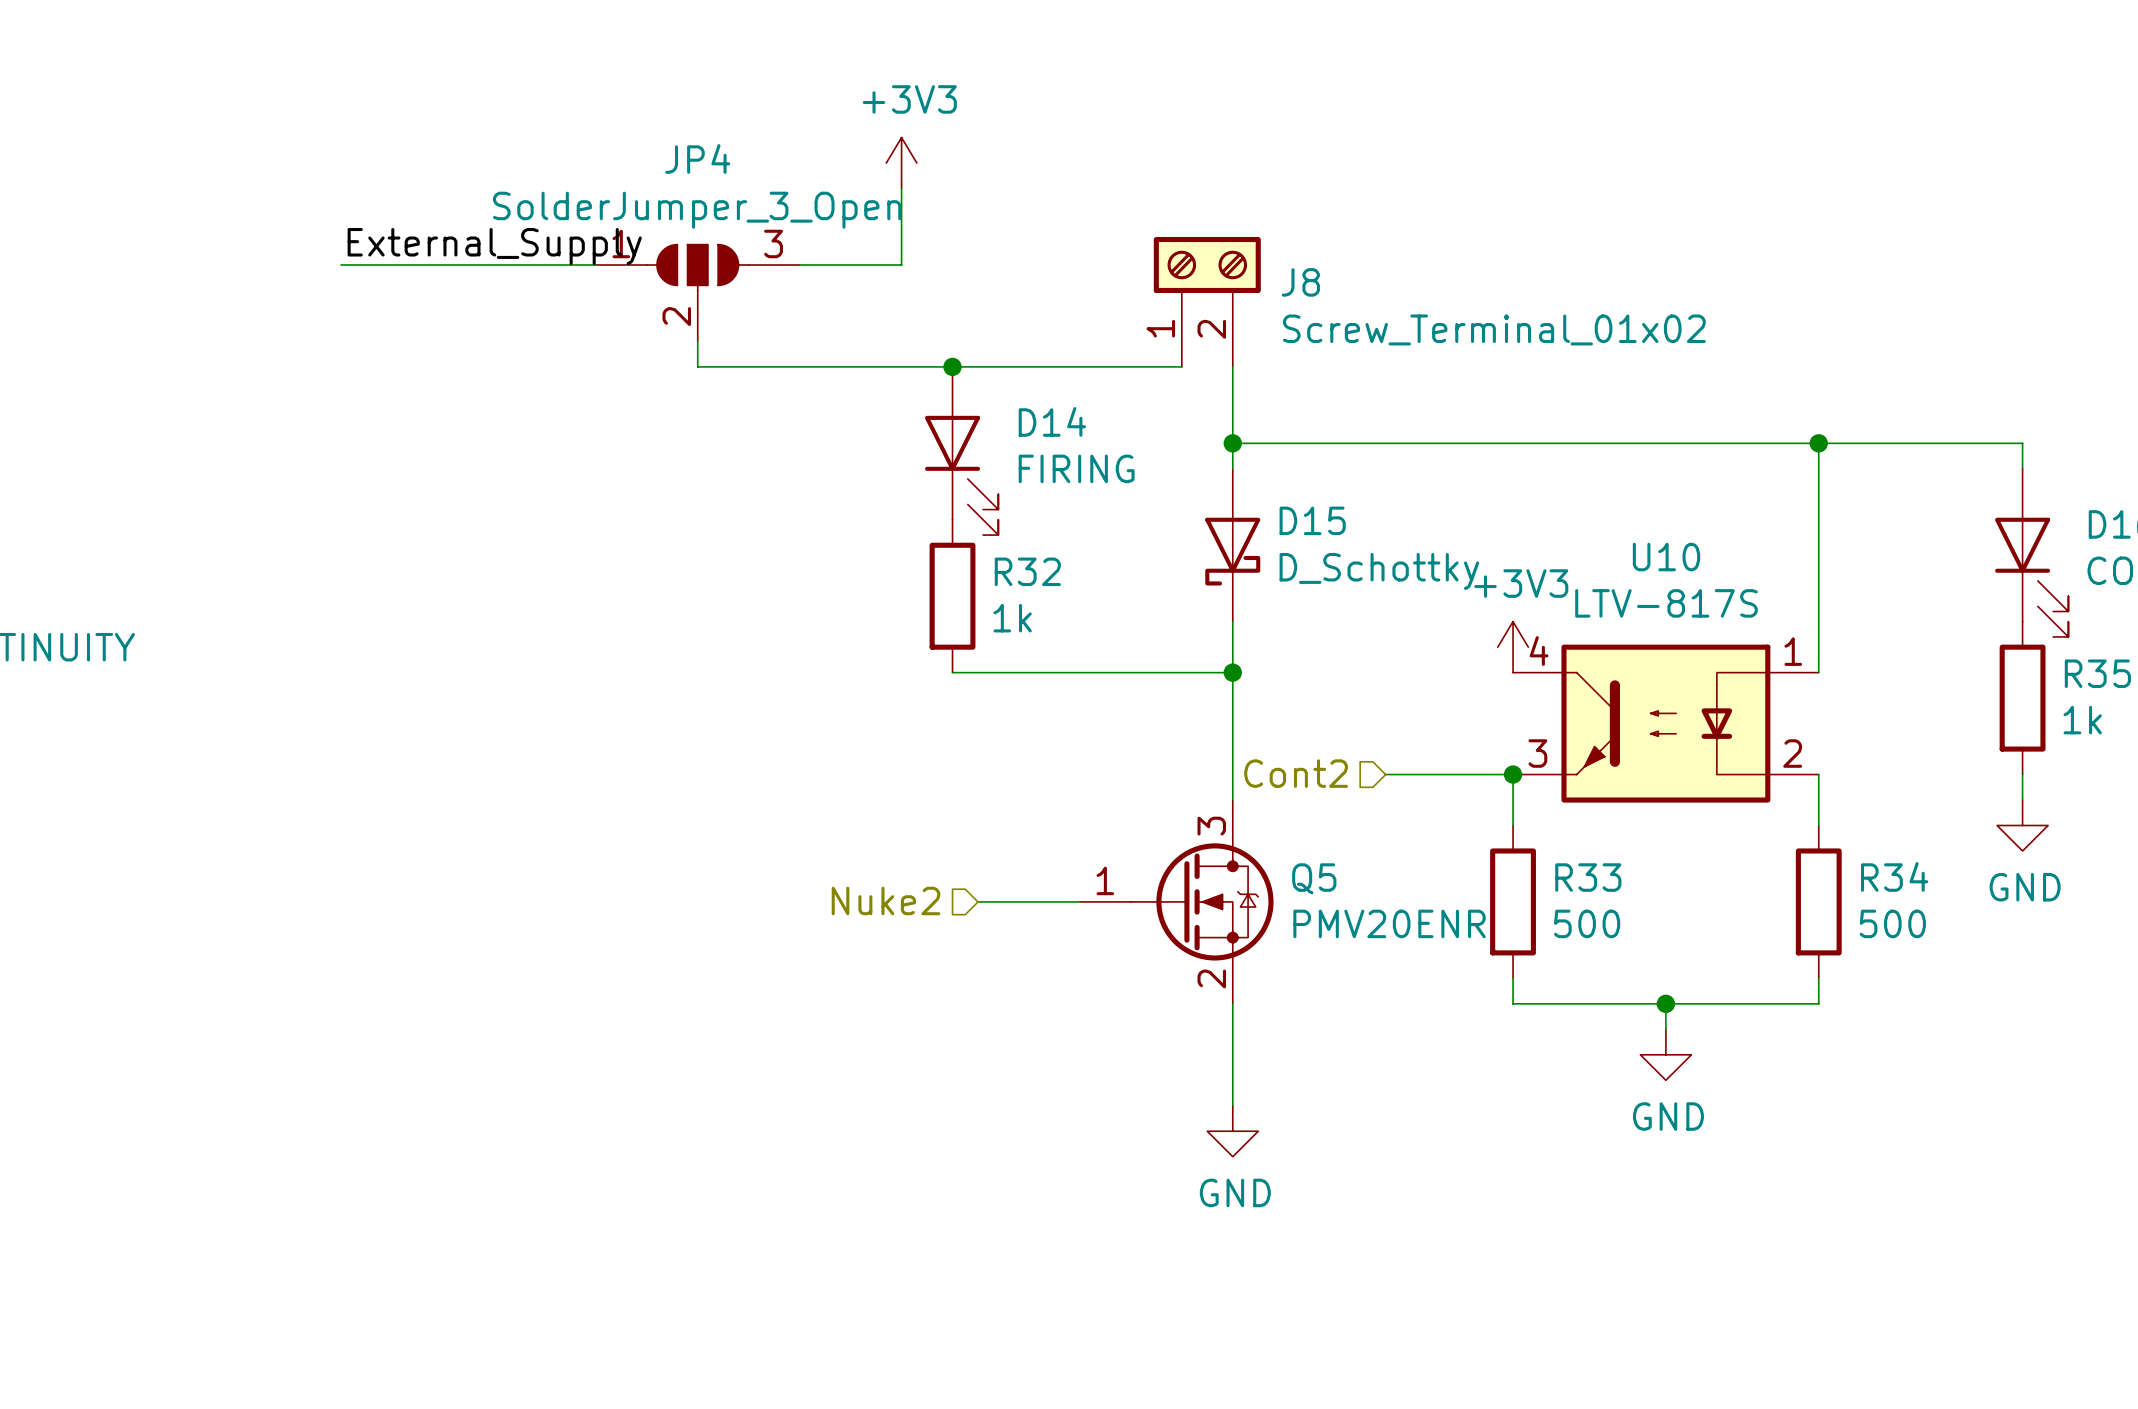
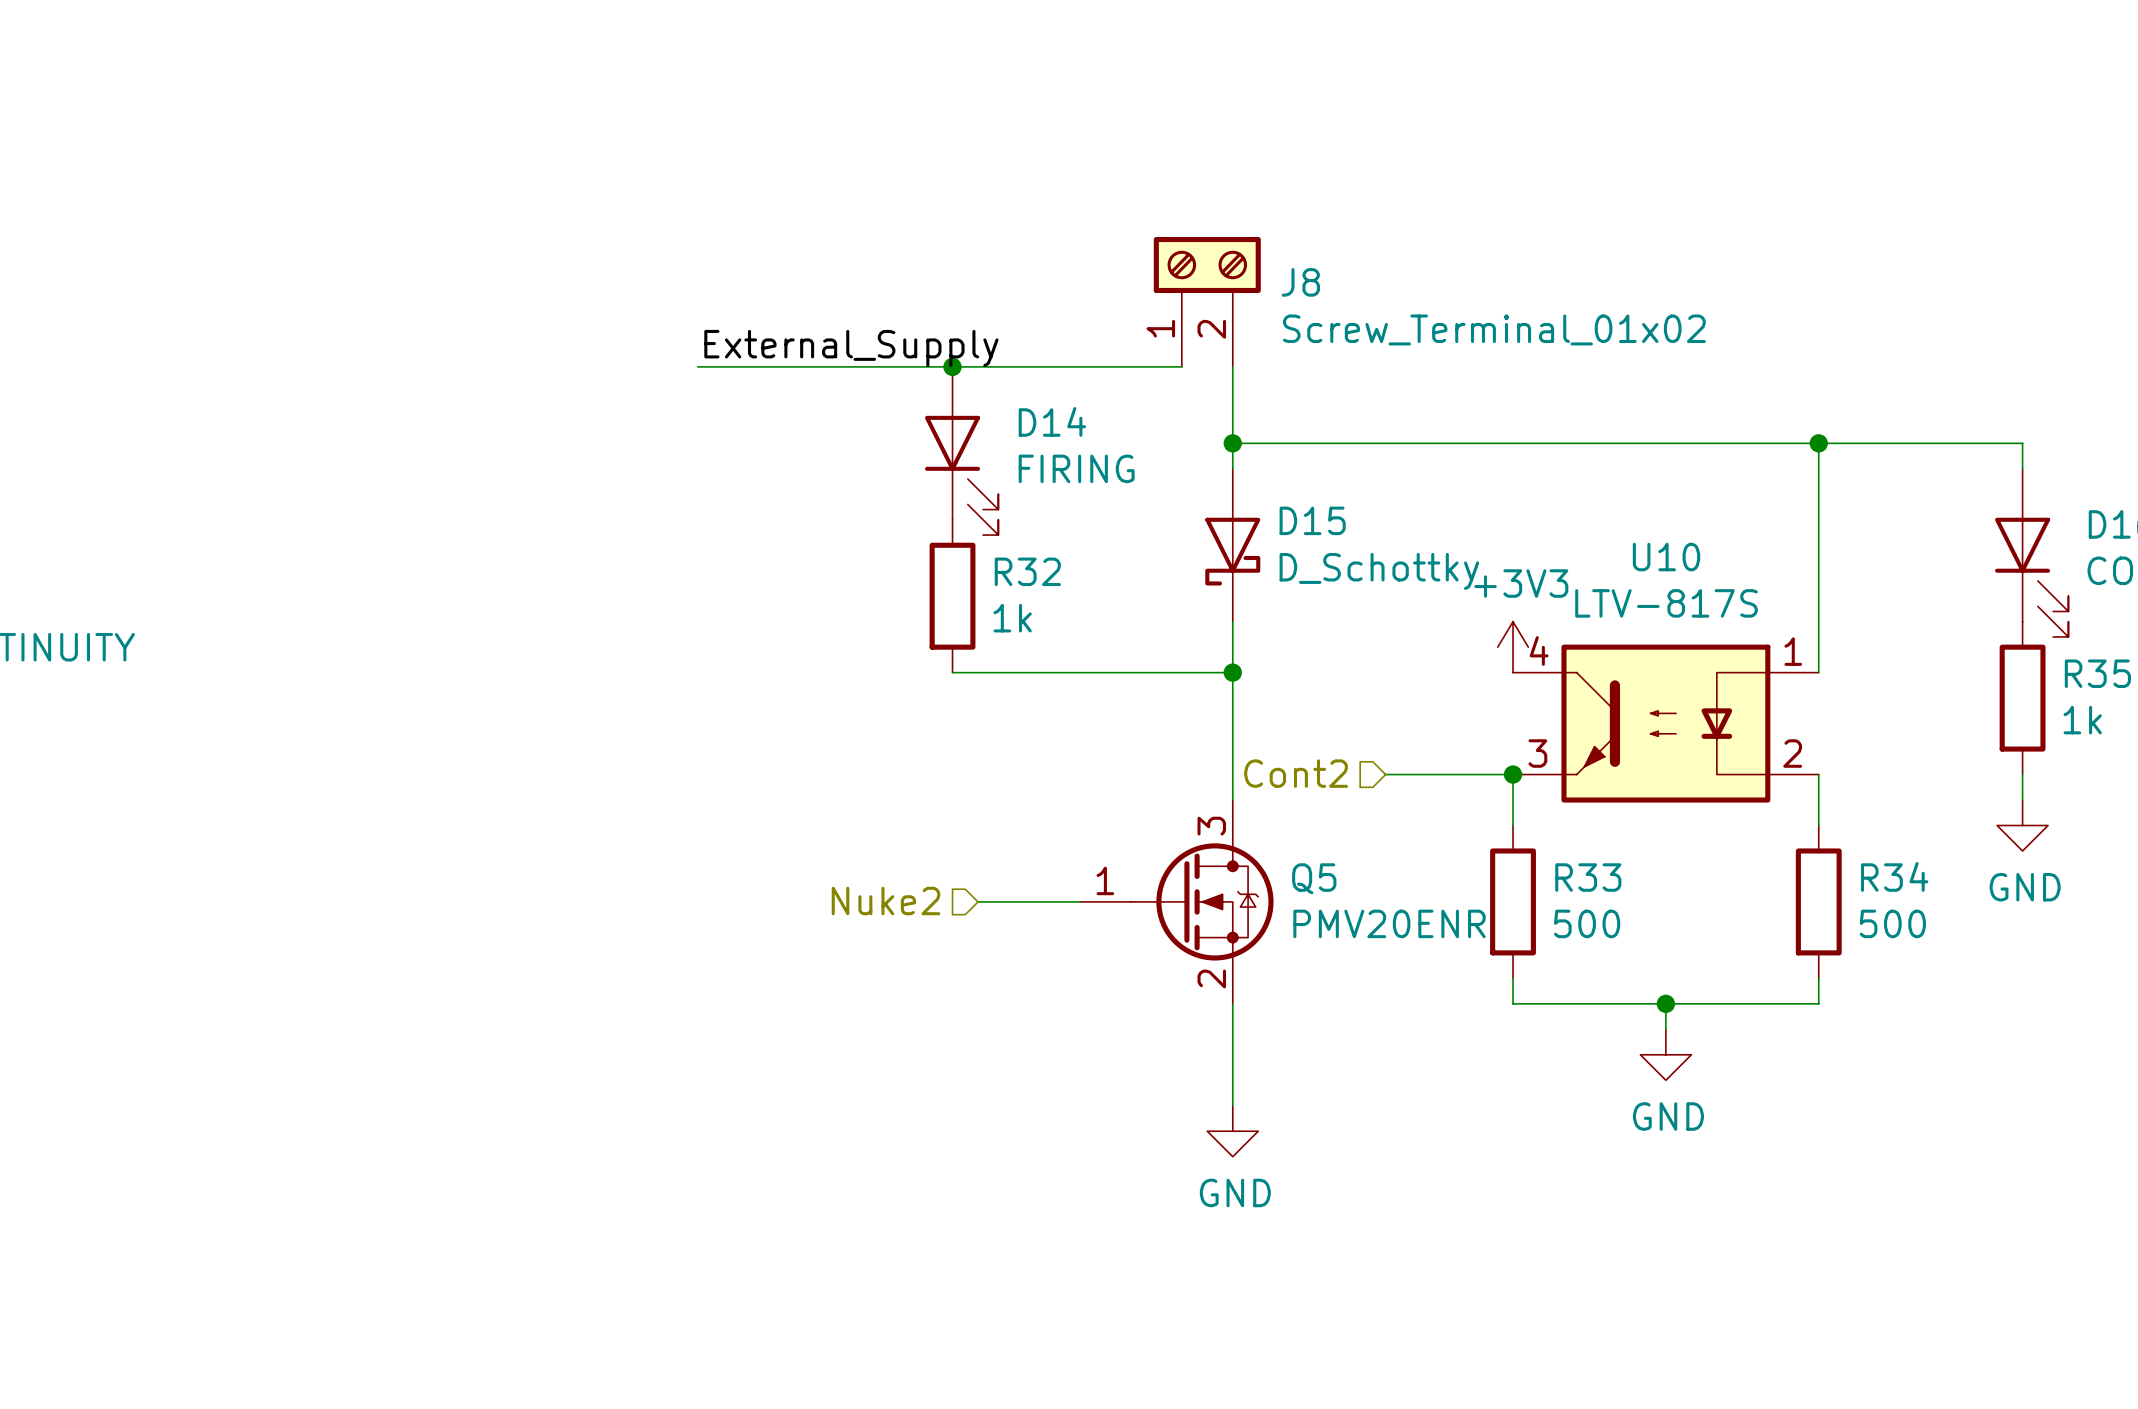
power symbol: +3V3 (901, 163) -> none
wire: (901, 188) (901, 265) (799, 265) -> none
label position: External_Supply (494, 246) -> External_Supply (851, 348)
wire: (341, 265) (595, 265) -> none
JP4: SolderJumper_3_Open (697, 293) -> none
wire: (697, 341) (697, 366) -> none

